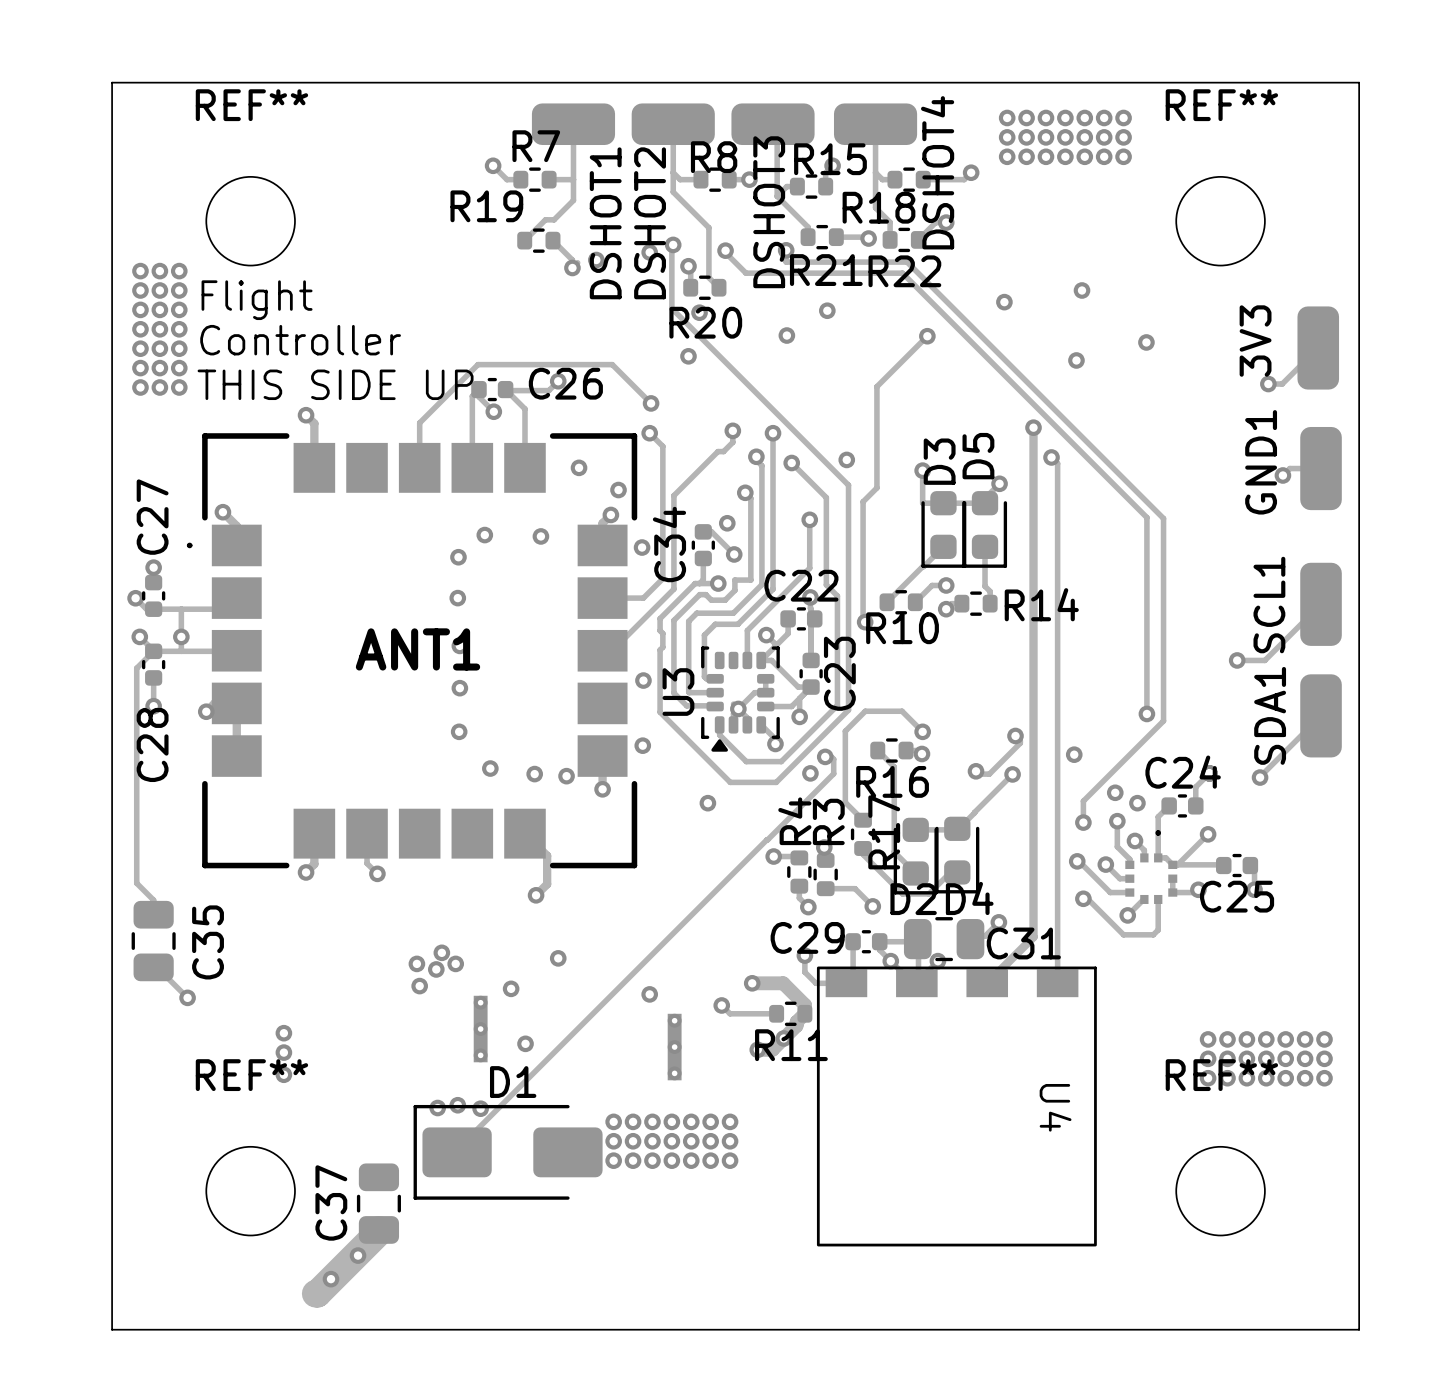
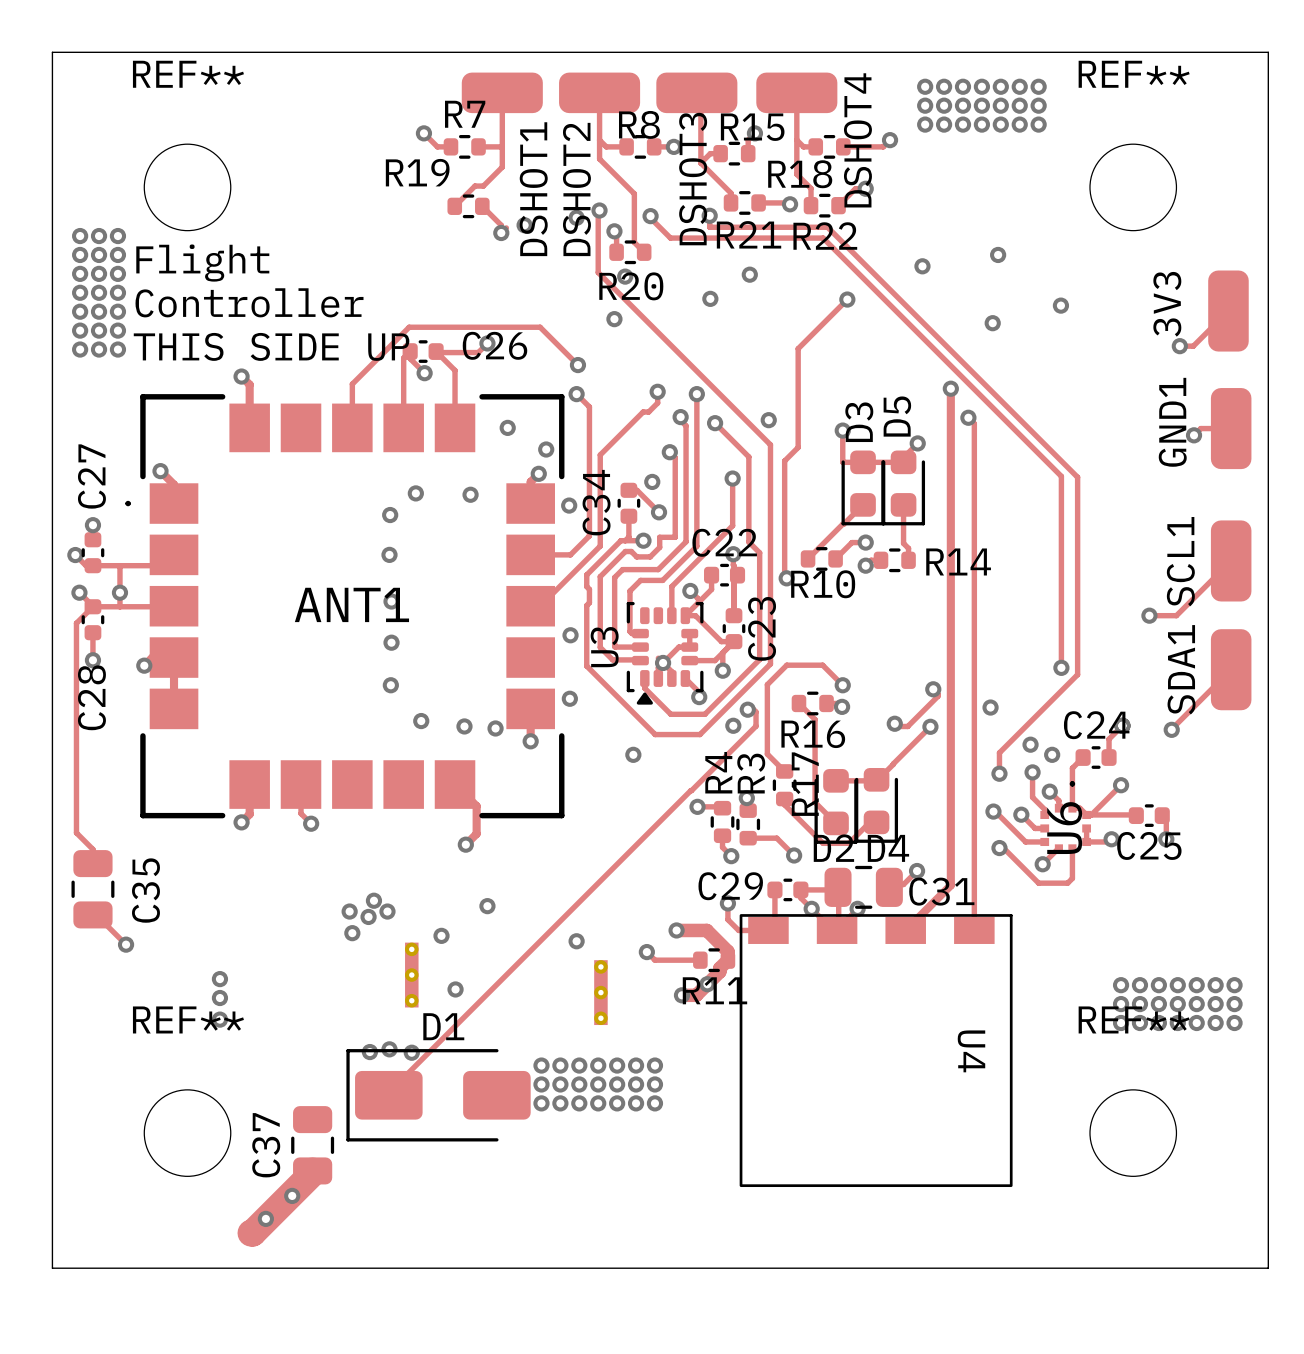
U6 name: none -> U6 (1064, 828)

